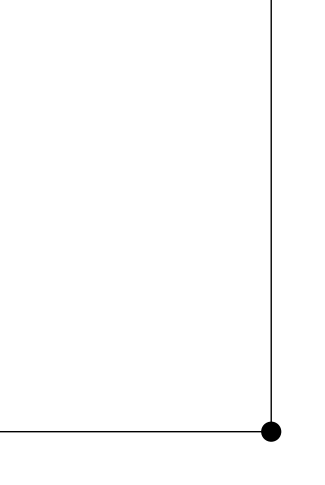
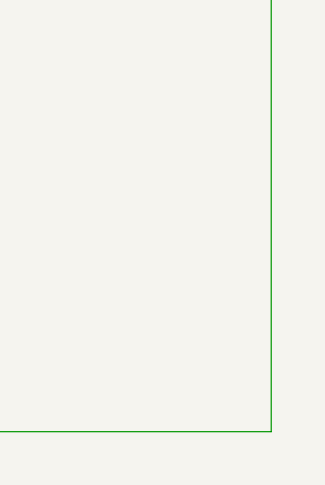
junction: (271, 431) -> none

